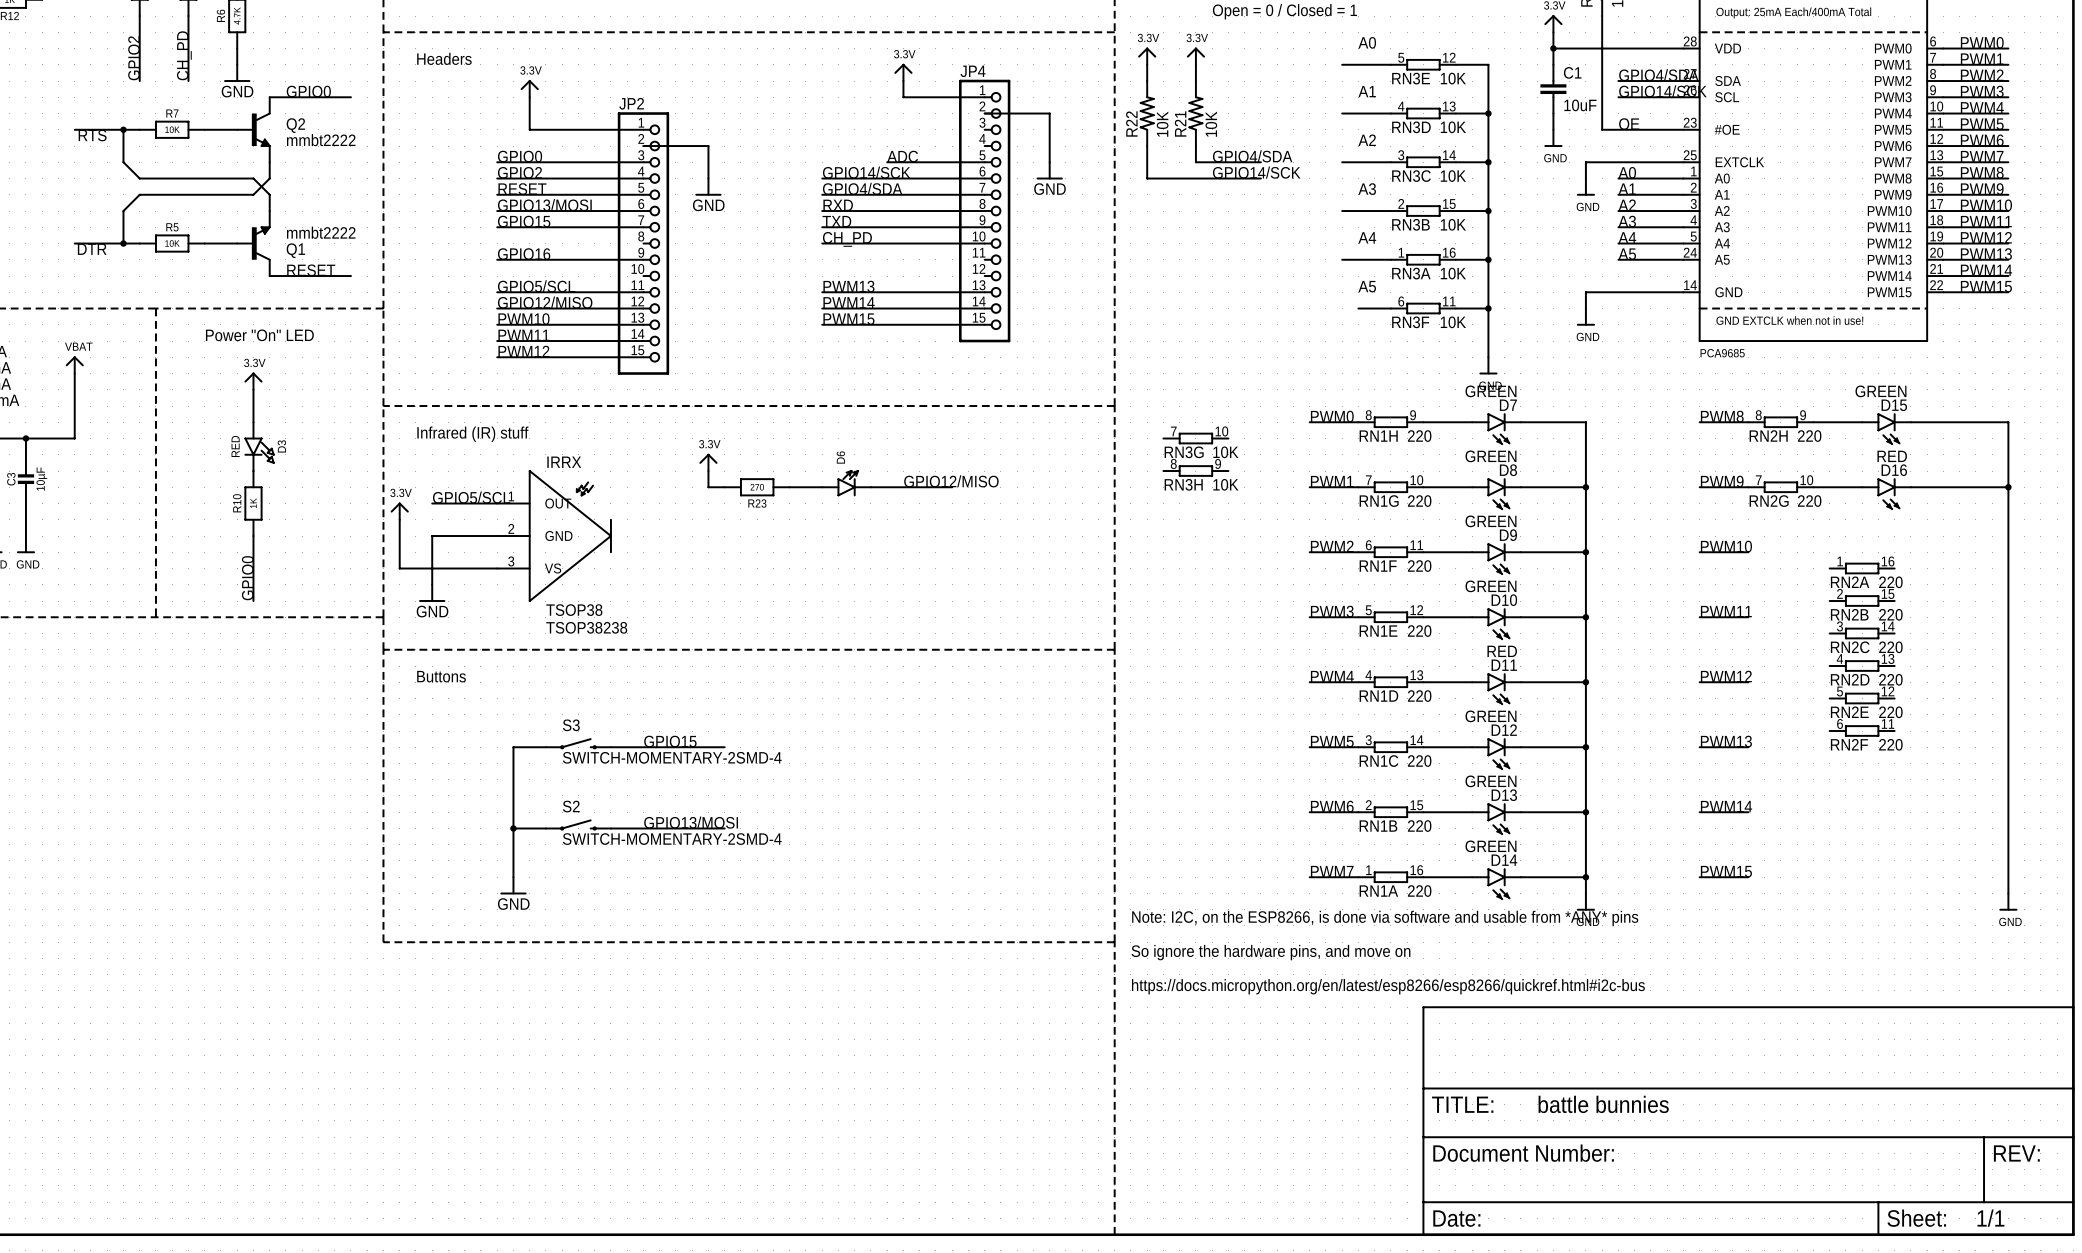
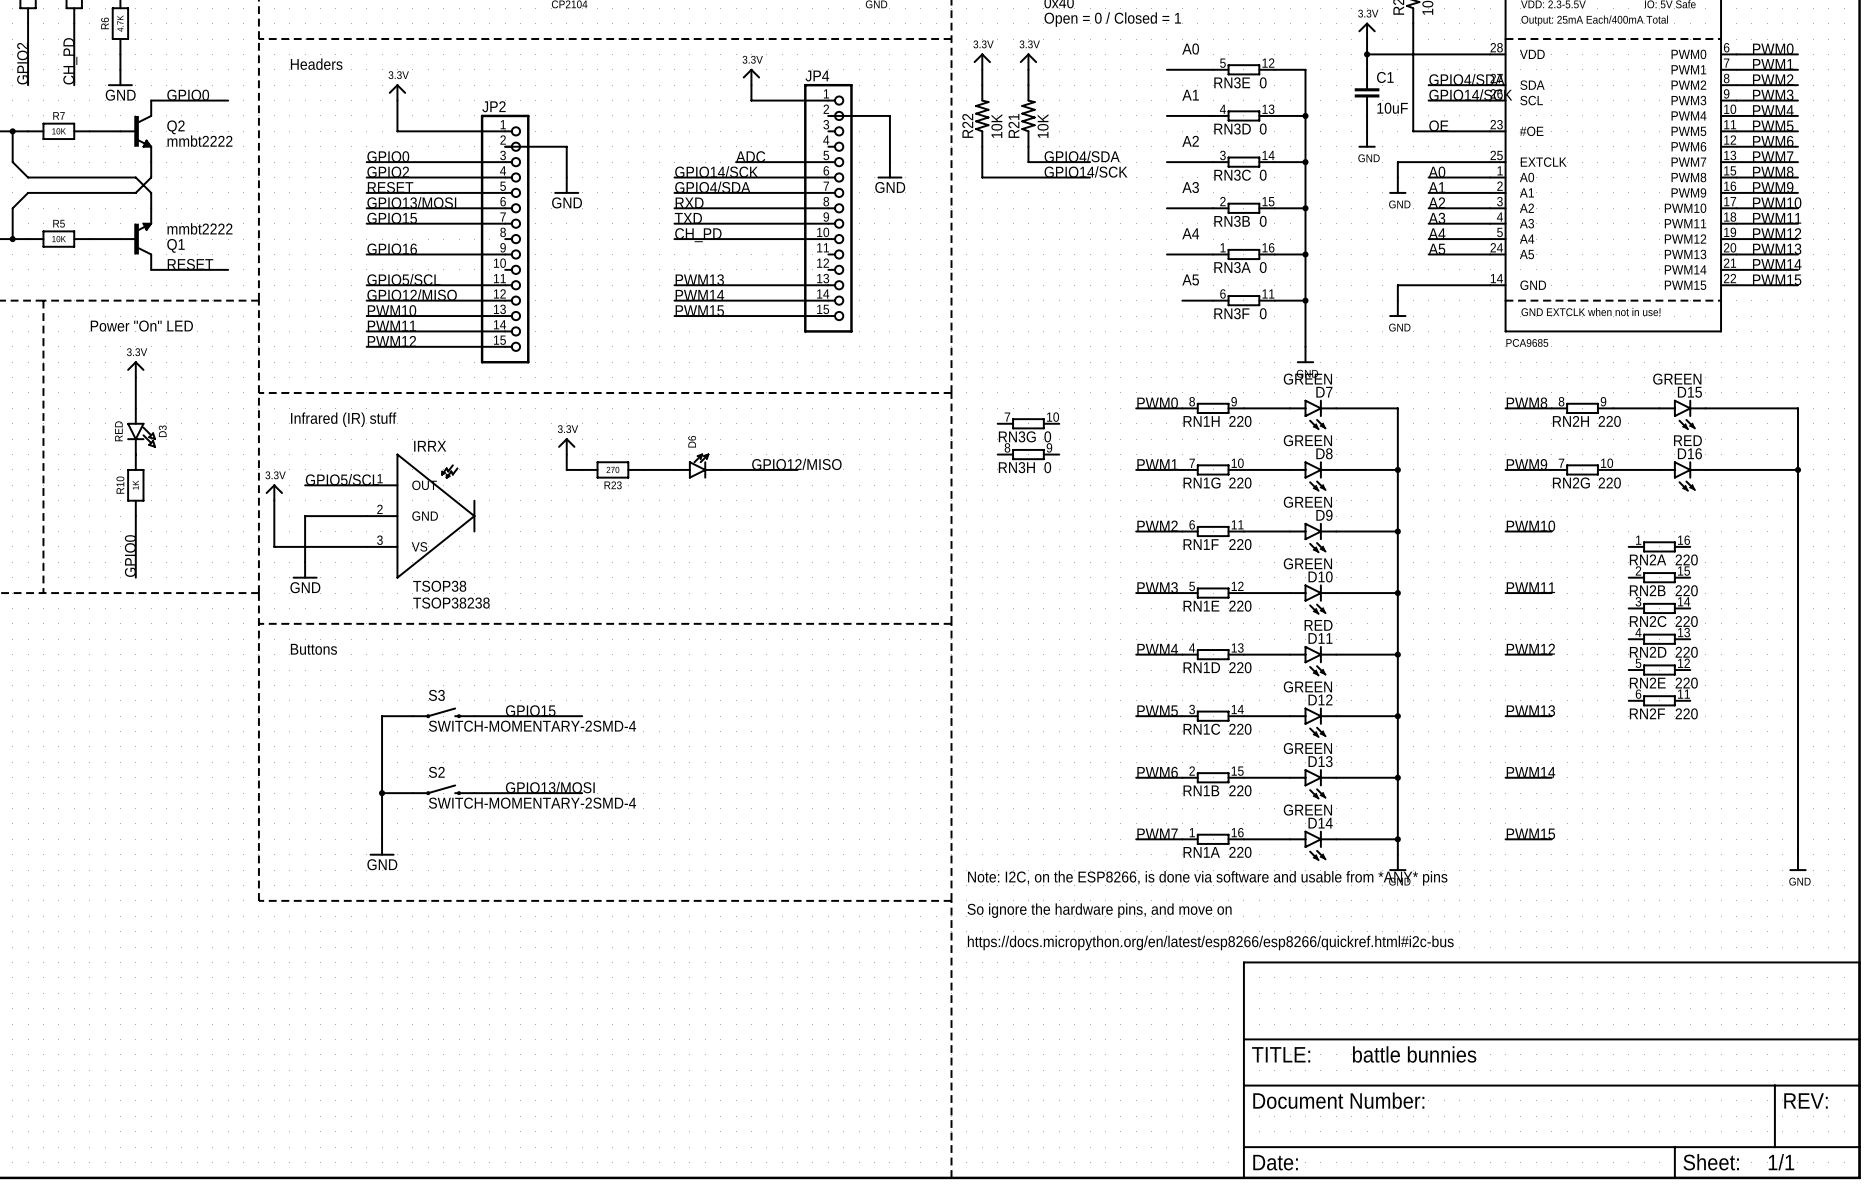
RN3E value: 10K (1453, 78) -> 0 (1263, 82)
RN3D value: 10K (1453, 127) -> 0 (1263, 129)
RN3C value: 10K (1453, 176) -> 0 (1263, 175)
RN3B value: 10K (1453, 224) -> 0 (1263, 221)
RN3A value: 10K (1453, 273) -> 0 (1263, 267)
RN3F value: 10K (1453, 322) -> 0 (1263, 313)
RN3G value: 10K (1225, 452) -> 0 (1047, 436)
RN3H value: 10K (1225, 484) -> 0 (1047, 467)

